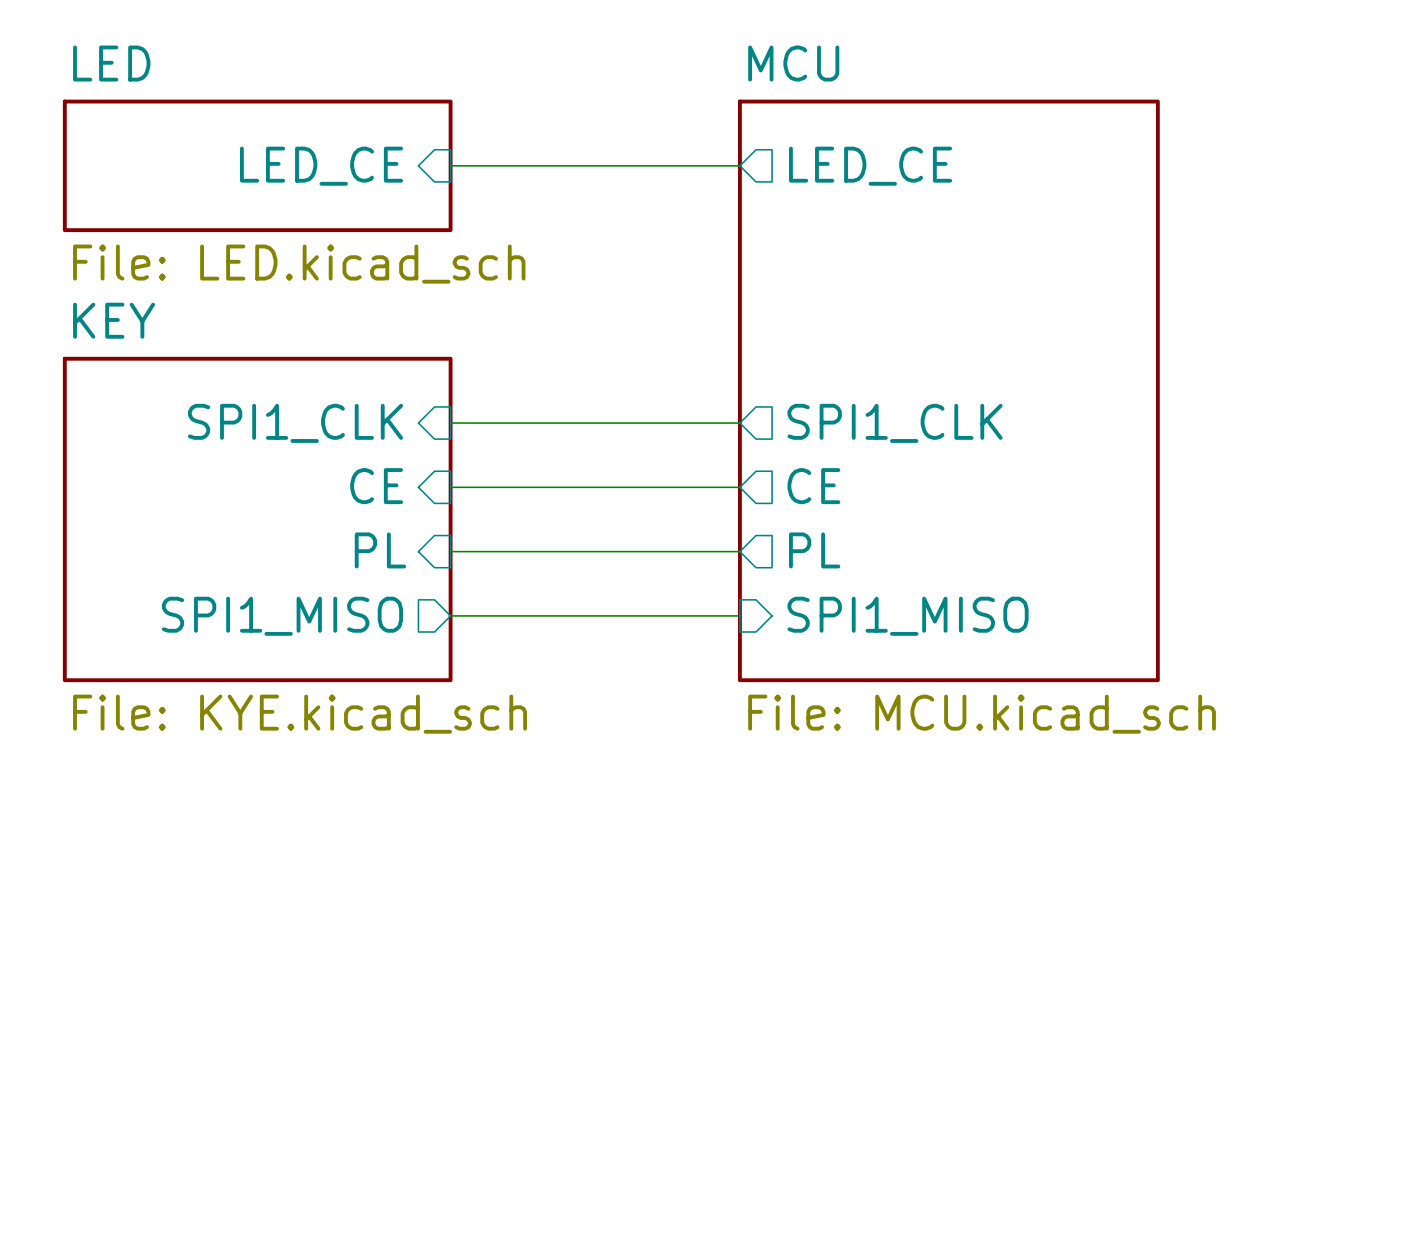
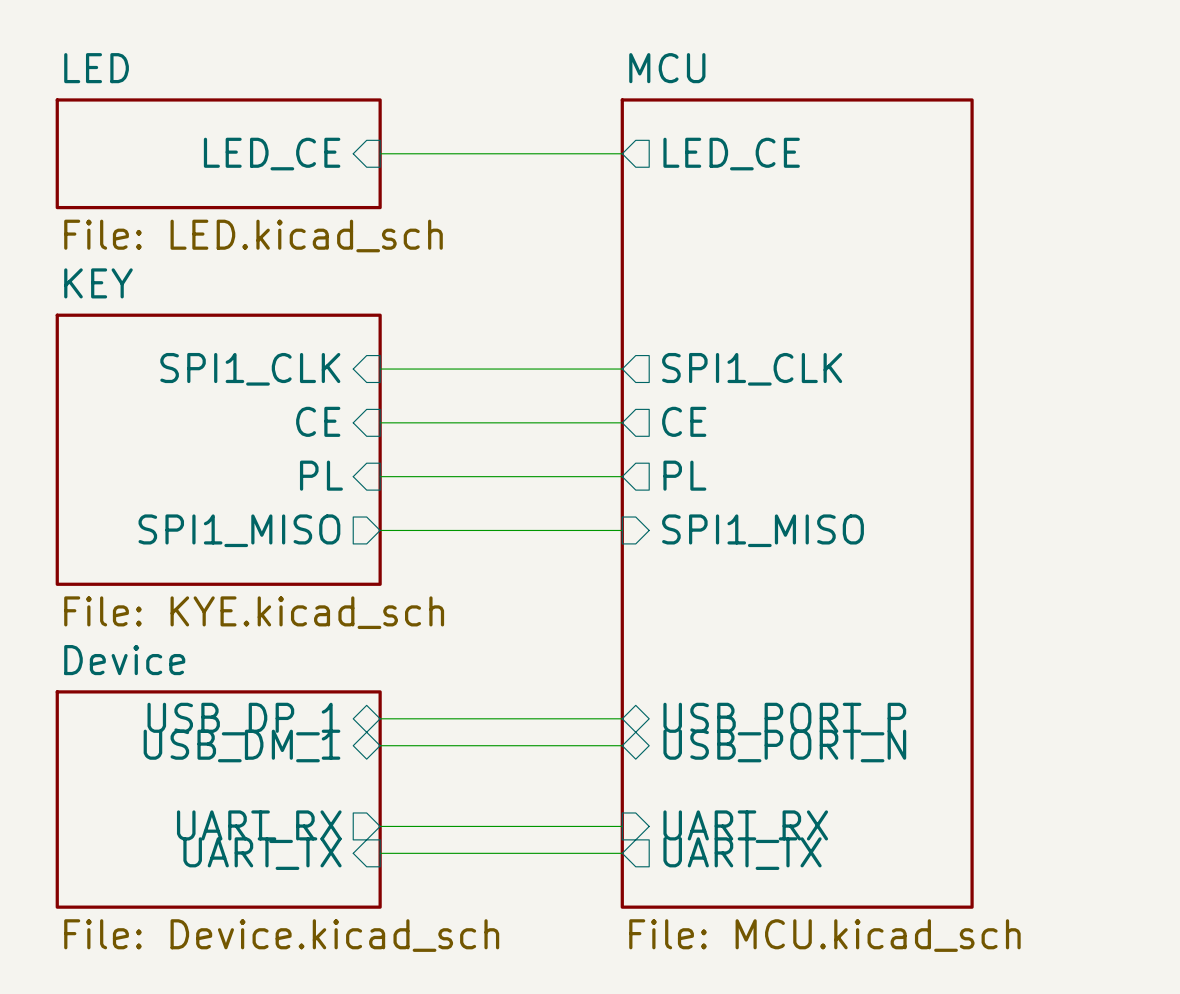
sheet MCU: File: MCU.kicad_sch (948, 390) -> none
sheet MCU: none -> File: MCU.kicad_sch (797, 503)
wire: none -> (380, 718) (622, 718)
sheet pin: none -> USB_DP_1 (243, 719)
sheet pin: none -> USB_PORT_P (784, 719)
sheet pin: none -> USB_DM_1 (241, 745)
wire: none -> (380, 745) (622, 745)
sheet pin: none -> USB_PORT_N (784, 745)
sheet Device: none -> File: Device.kicad_sch (218, 799)
sheet pin: none -> UART_RX (259, 826)
wire: none -> (380, 826) (622, 826)
sheet pin: none -> UART_RX (745, 826)
wire: none -> (380, 853) (622, 853)
sheet pin: none -> UART_TX (262, 853)
sheet pin: none -> UART_TX (742, 853)

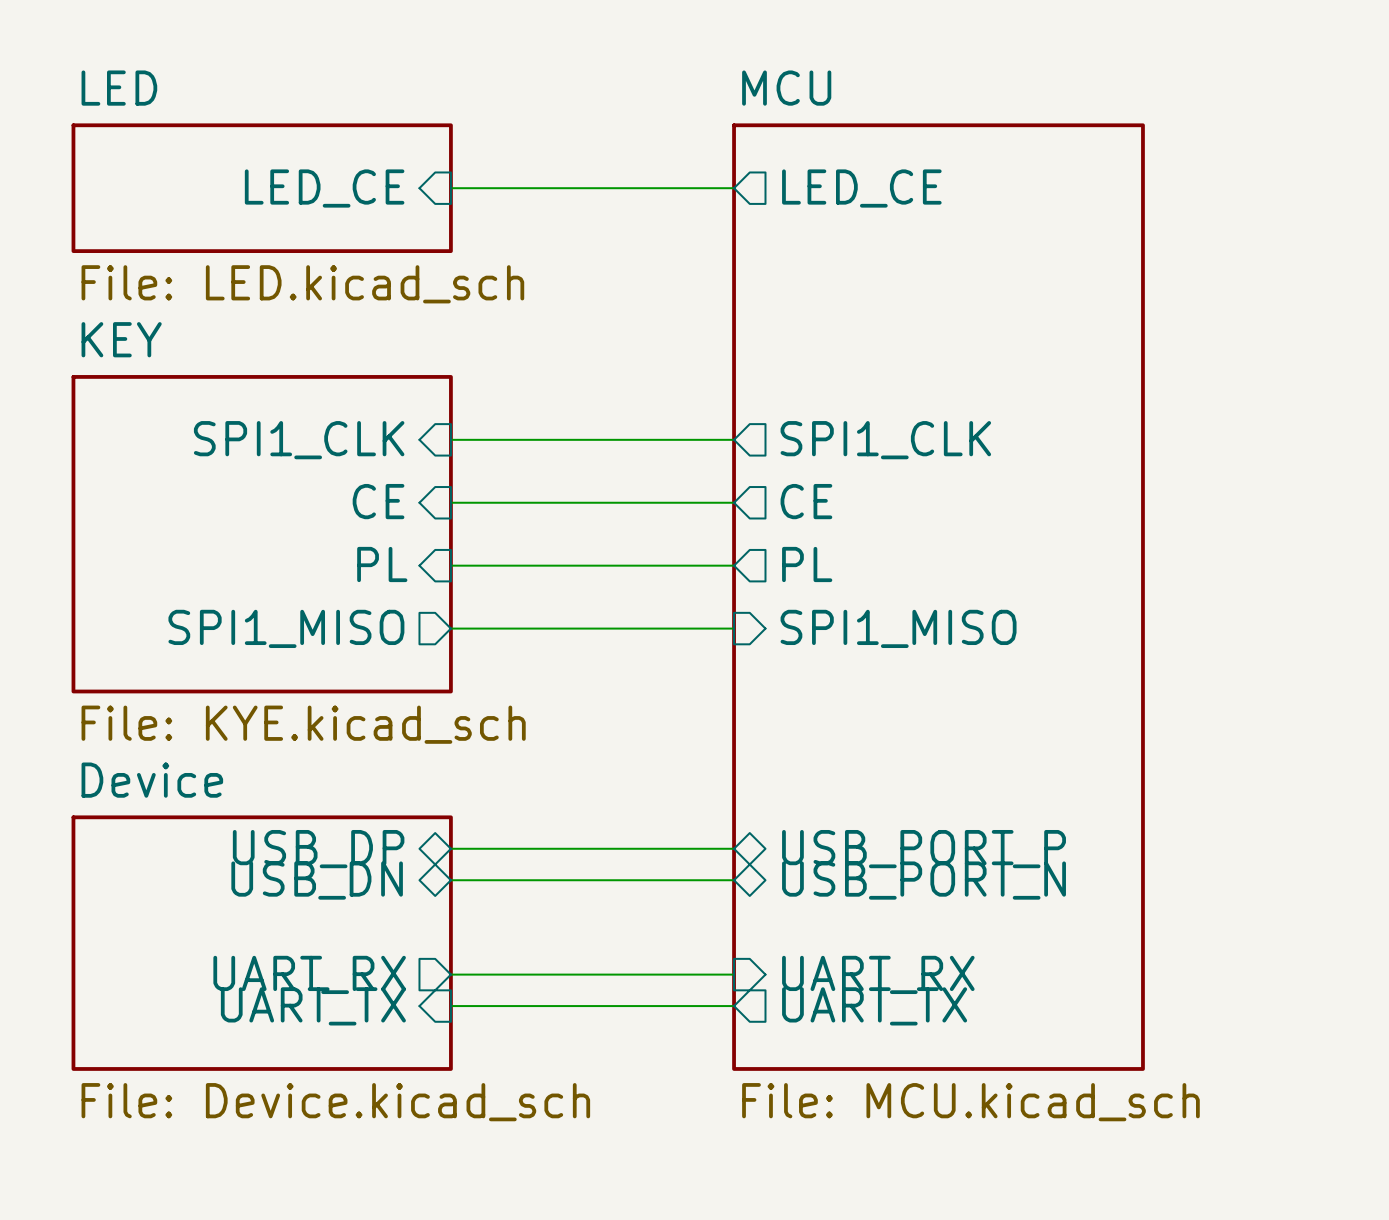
sheet pin: USB_DP_1 (243, 719) -> USB_DP (318, 849)
sheet pin: USB_DM_1 (241, 745) -> USB_DN (317, 880)

